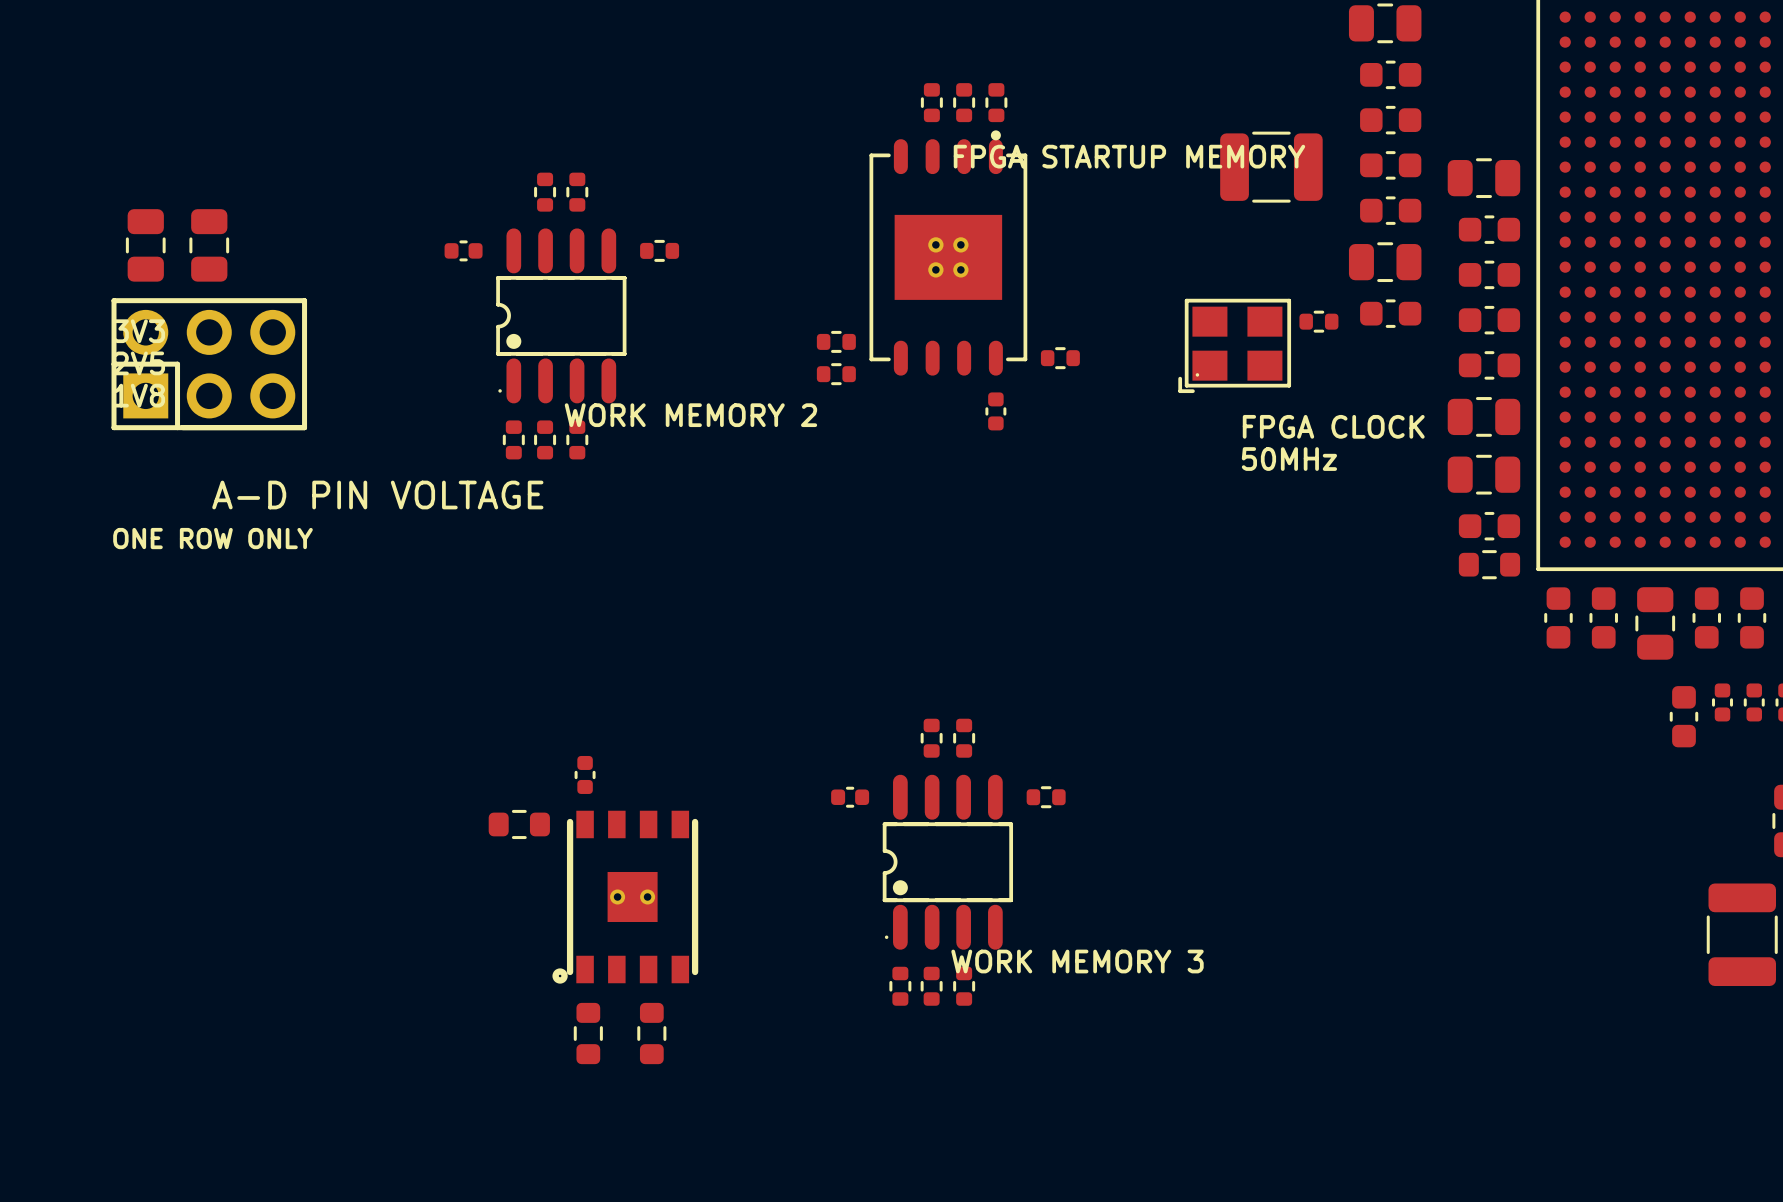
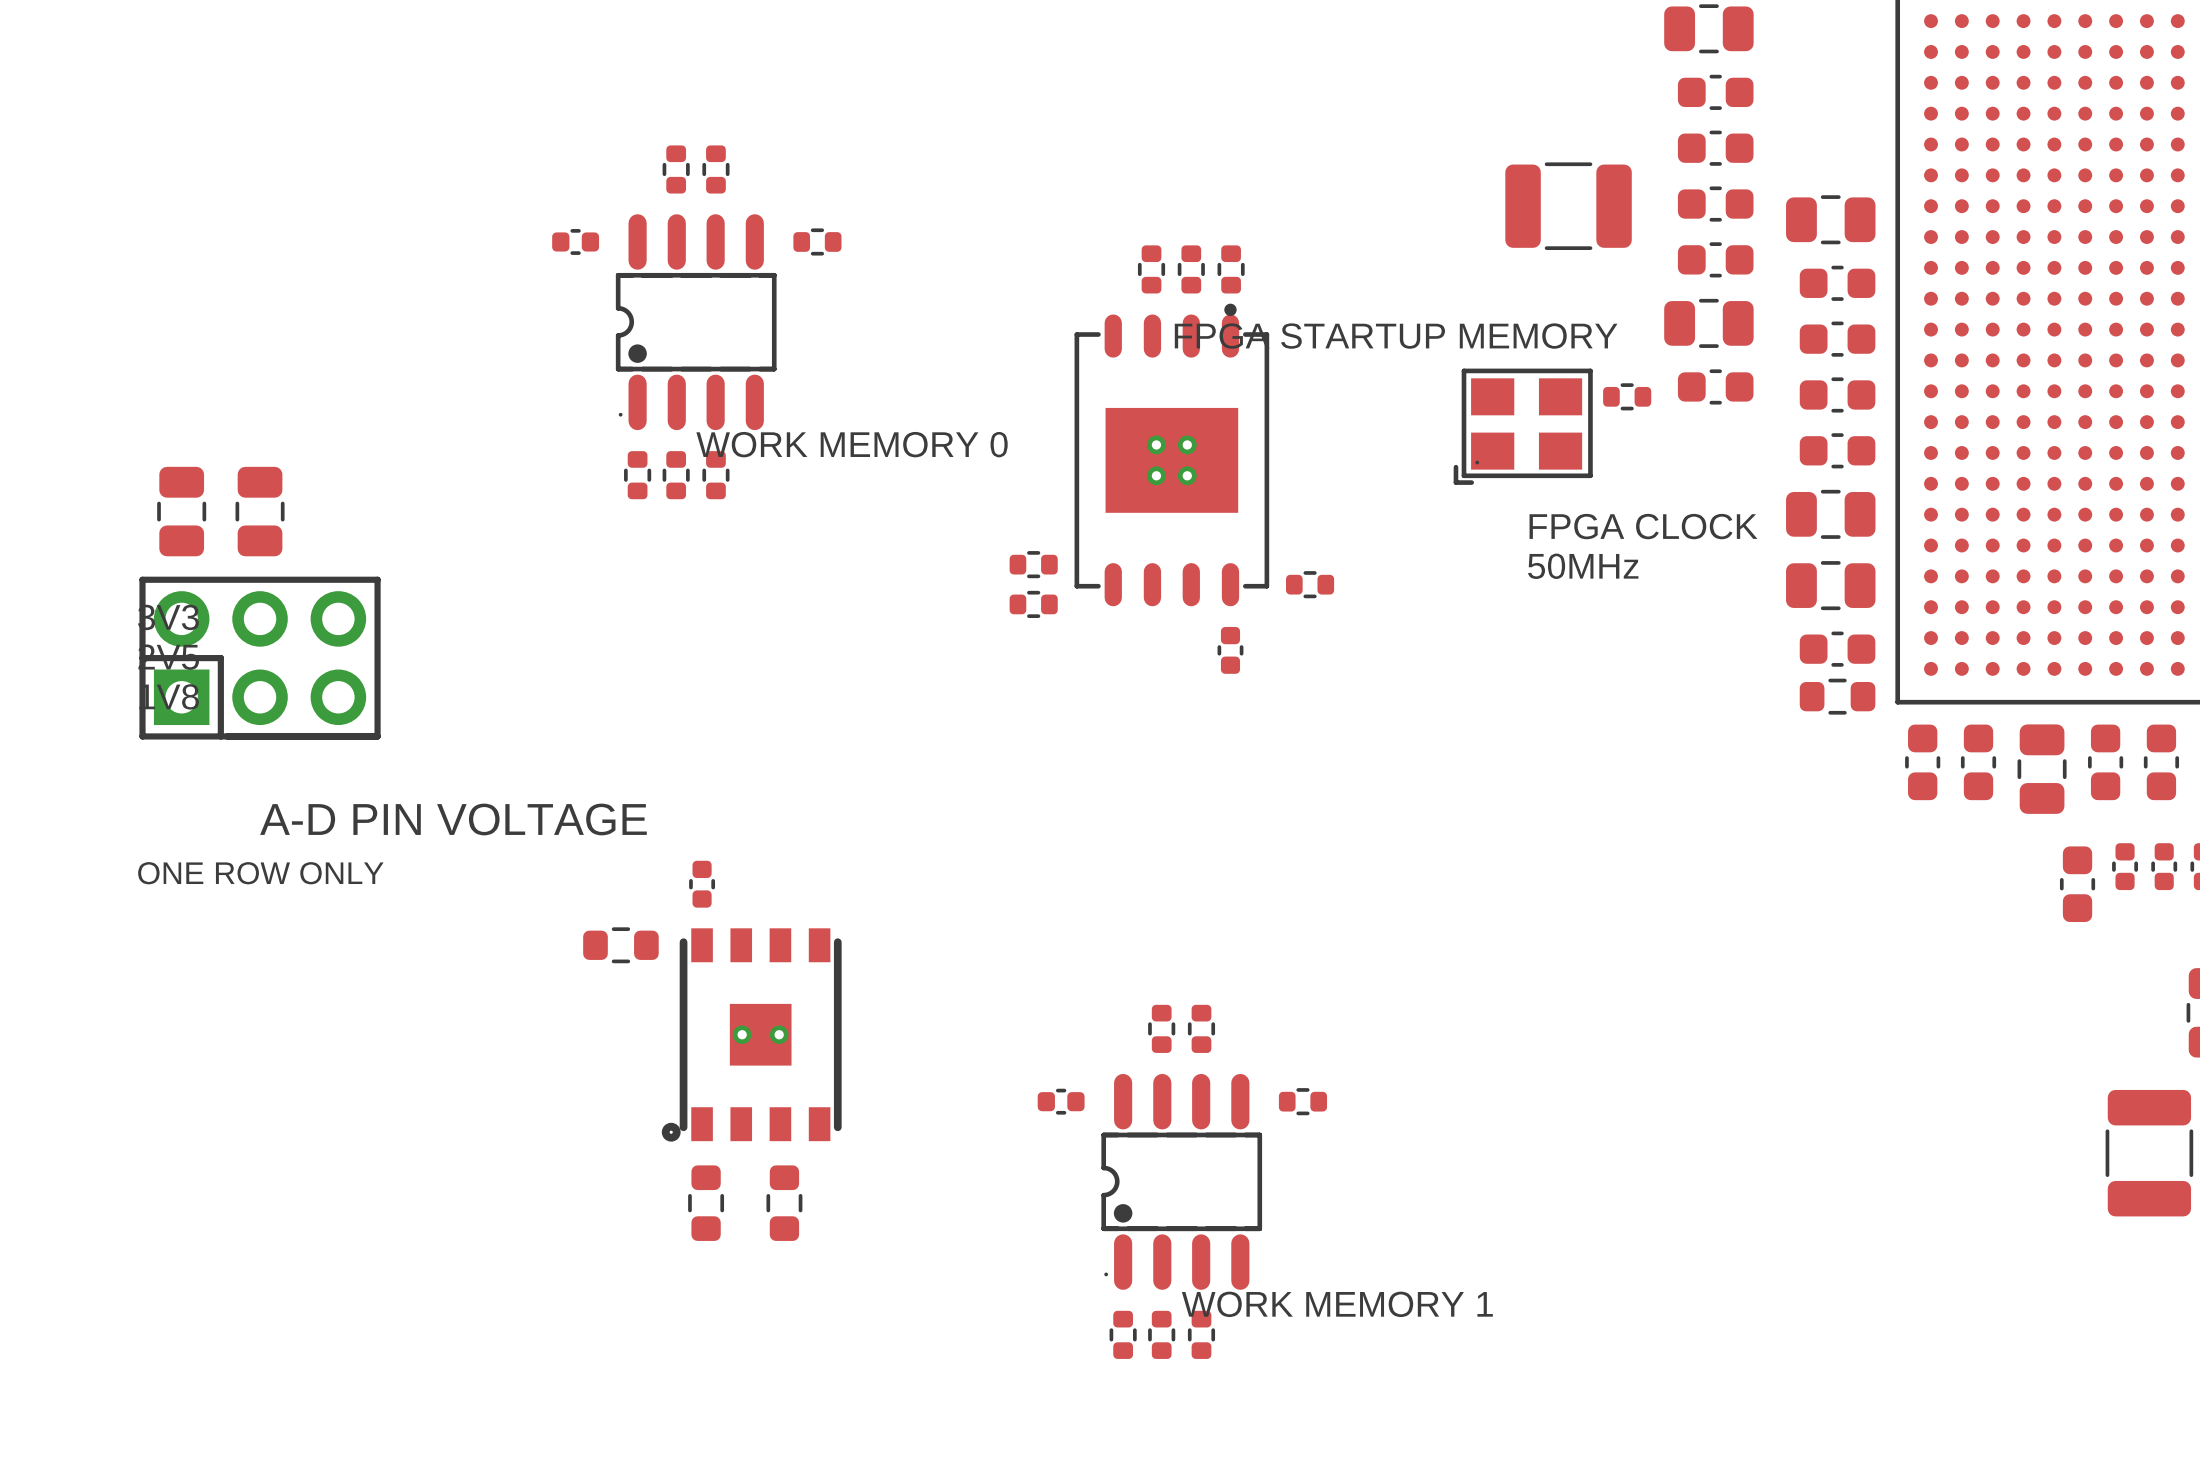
part: (931, 102) -> none
part: (964, 102) -> none
part: (996, 102) -> none
part: none -> (676, 169)
part: none -> (715, 169)
part: (545, 192) -> none
part: (577, 192) -> none
part: none -> (817, 241)
part: none -> (1151, 269)
part: none -> (1191, 269)
part: none -> (1231, 269)
part: (145, 245) -> none
part: (209, 245) -> none
part position: (463, 250) -> (575, 241)
part: (659, 250) -> none
part position: (948, 253) -> (1171, 454)
part: none -> (696, 322)
part: (561, 315) -> none
part: (836, 341) -> none
part: (1060, 358) -> none
part position: (209, 364) -> (260, 658)
part: (836, 374) -> none
part: none -> (637, 475)
part: none -> (676, 475)
part: none -> (715, 475)
part position: (995, 411) -> (1230, 650)
part: none -> (181, 511)
part: none -> (260, 511)
part: (513, 439) -> none
part: (545, 439) -> none
part: (577, 439) -> none
part: none -> (1033, 564)
part: none -> (1310, 584)
part: none -> (1033, 604)
part: (931, 738) -> none
part: (964, 738) -> none
part position: (585, 774) -> (702, 884)
part position: (850, 797) -> (1061, 1101)
part: (1046, 797) -> none
part position: (519, 824) -> (620, 945)
part: none -> (1161, 1028)
part: none -> (1201, 1028)
part: (947, 862) -> none
part: none -> (1302, 1101)
part position: (625, 897) -> (751, 1034)
part: none -> (1181, 1181)
part: none -> (706, 1203)
part: none -> (784, 1203)
part: (900, 986) -> none
part: (931, 986) -> none
part: (964, 986) -> none
part: (588, 1033) -> none
part: (651, 1033) -> none
part: none -> (1123, 1334)
part: none -> (1161, 1334)
part: none -> (1201, 1334)

